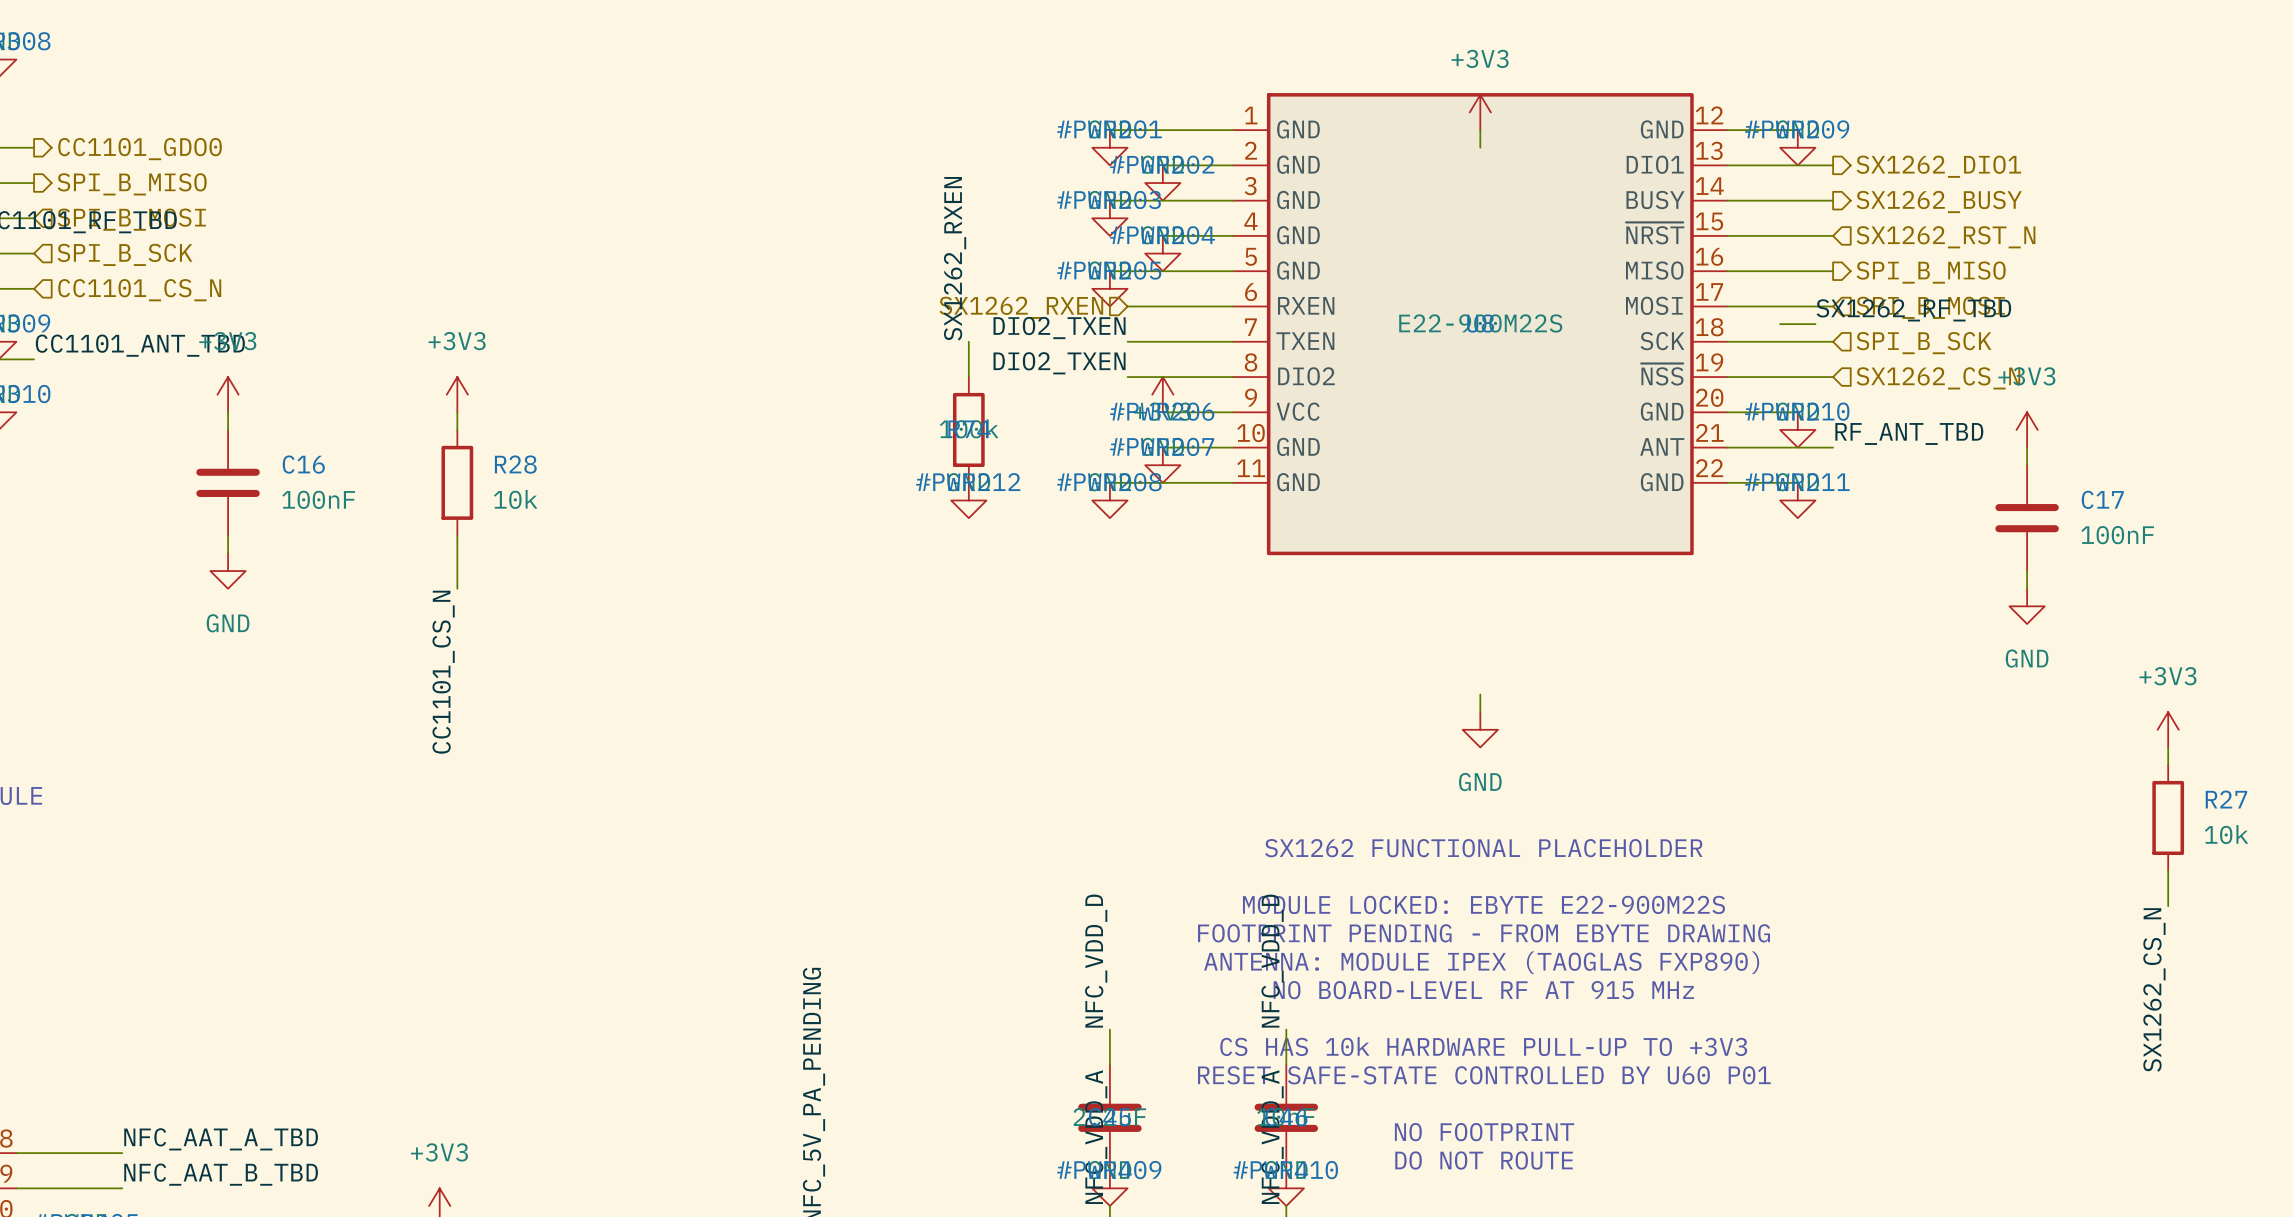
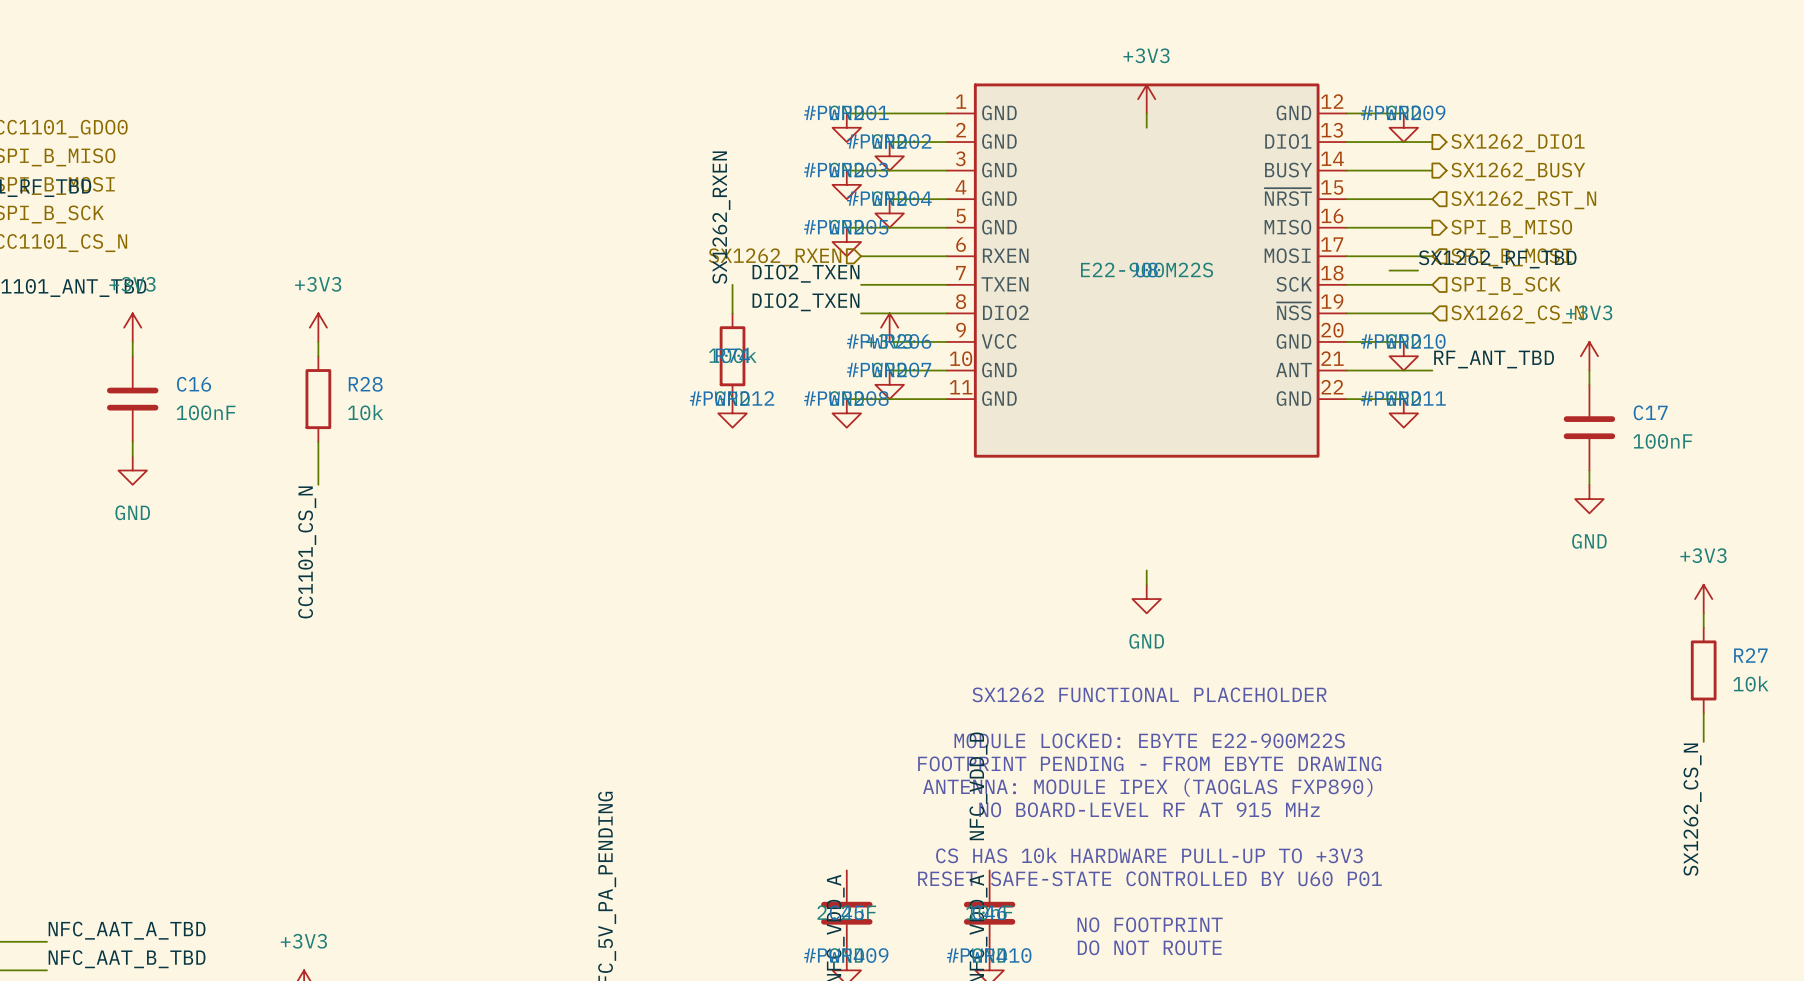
label: NFC_VDD_D (1096, 961) -> none
wire: (1109, 1029) (1109, 1064) -> none
wire: (1286, 1029) (1286, 1064) -> none

